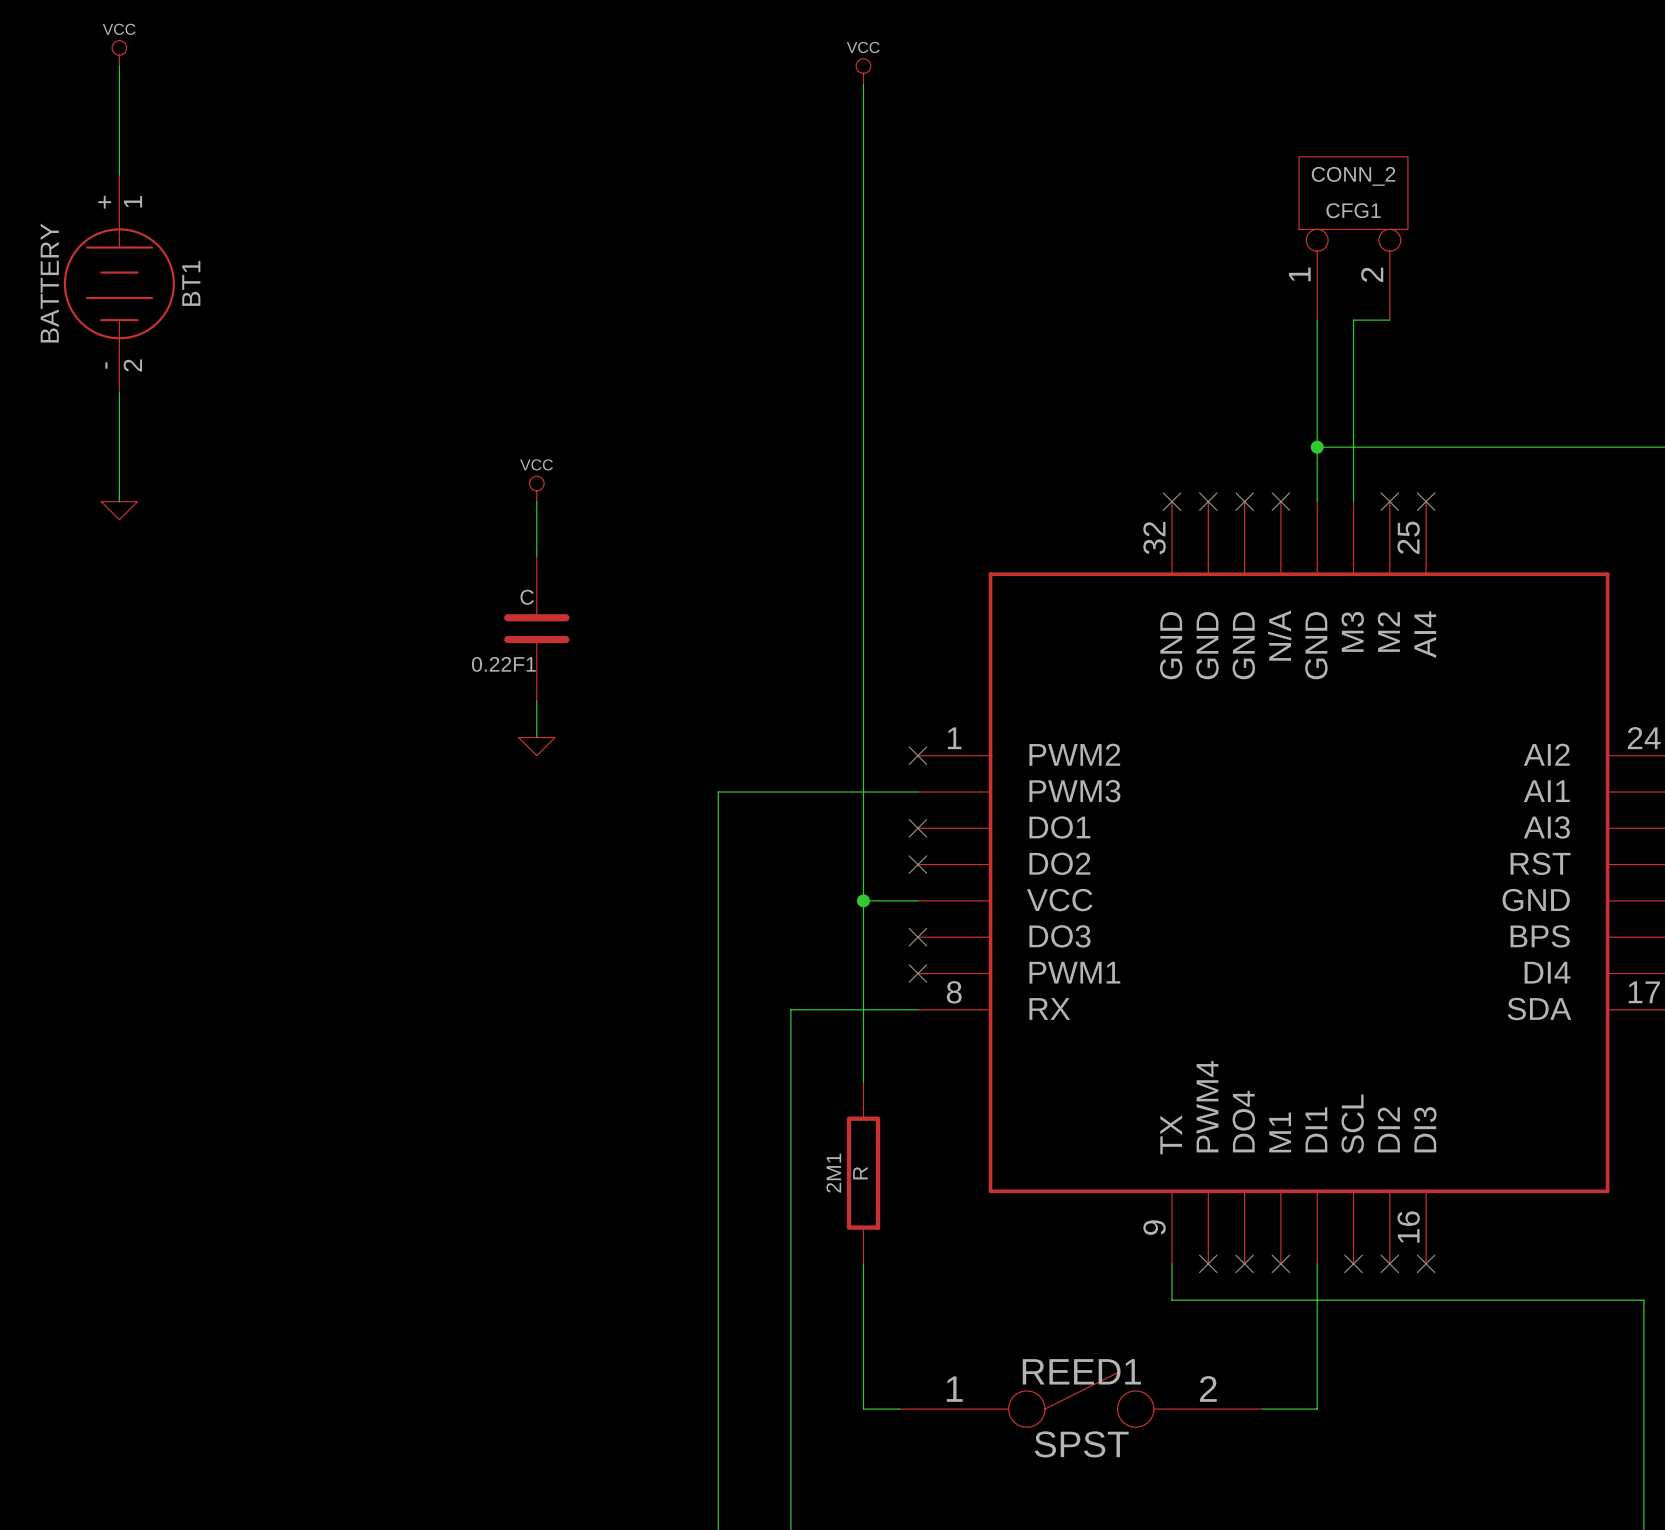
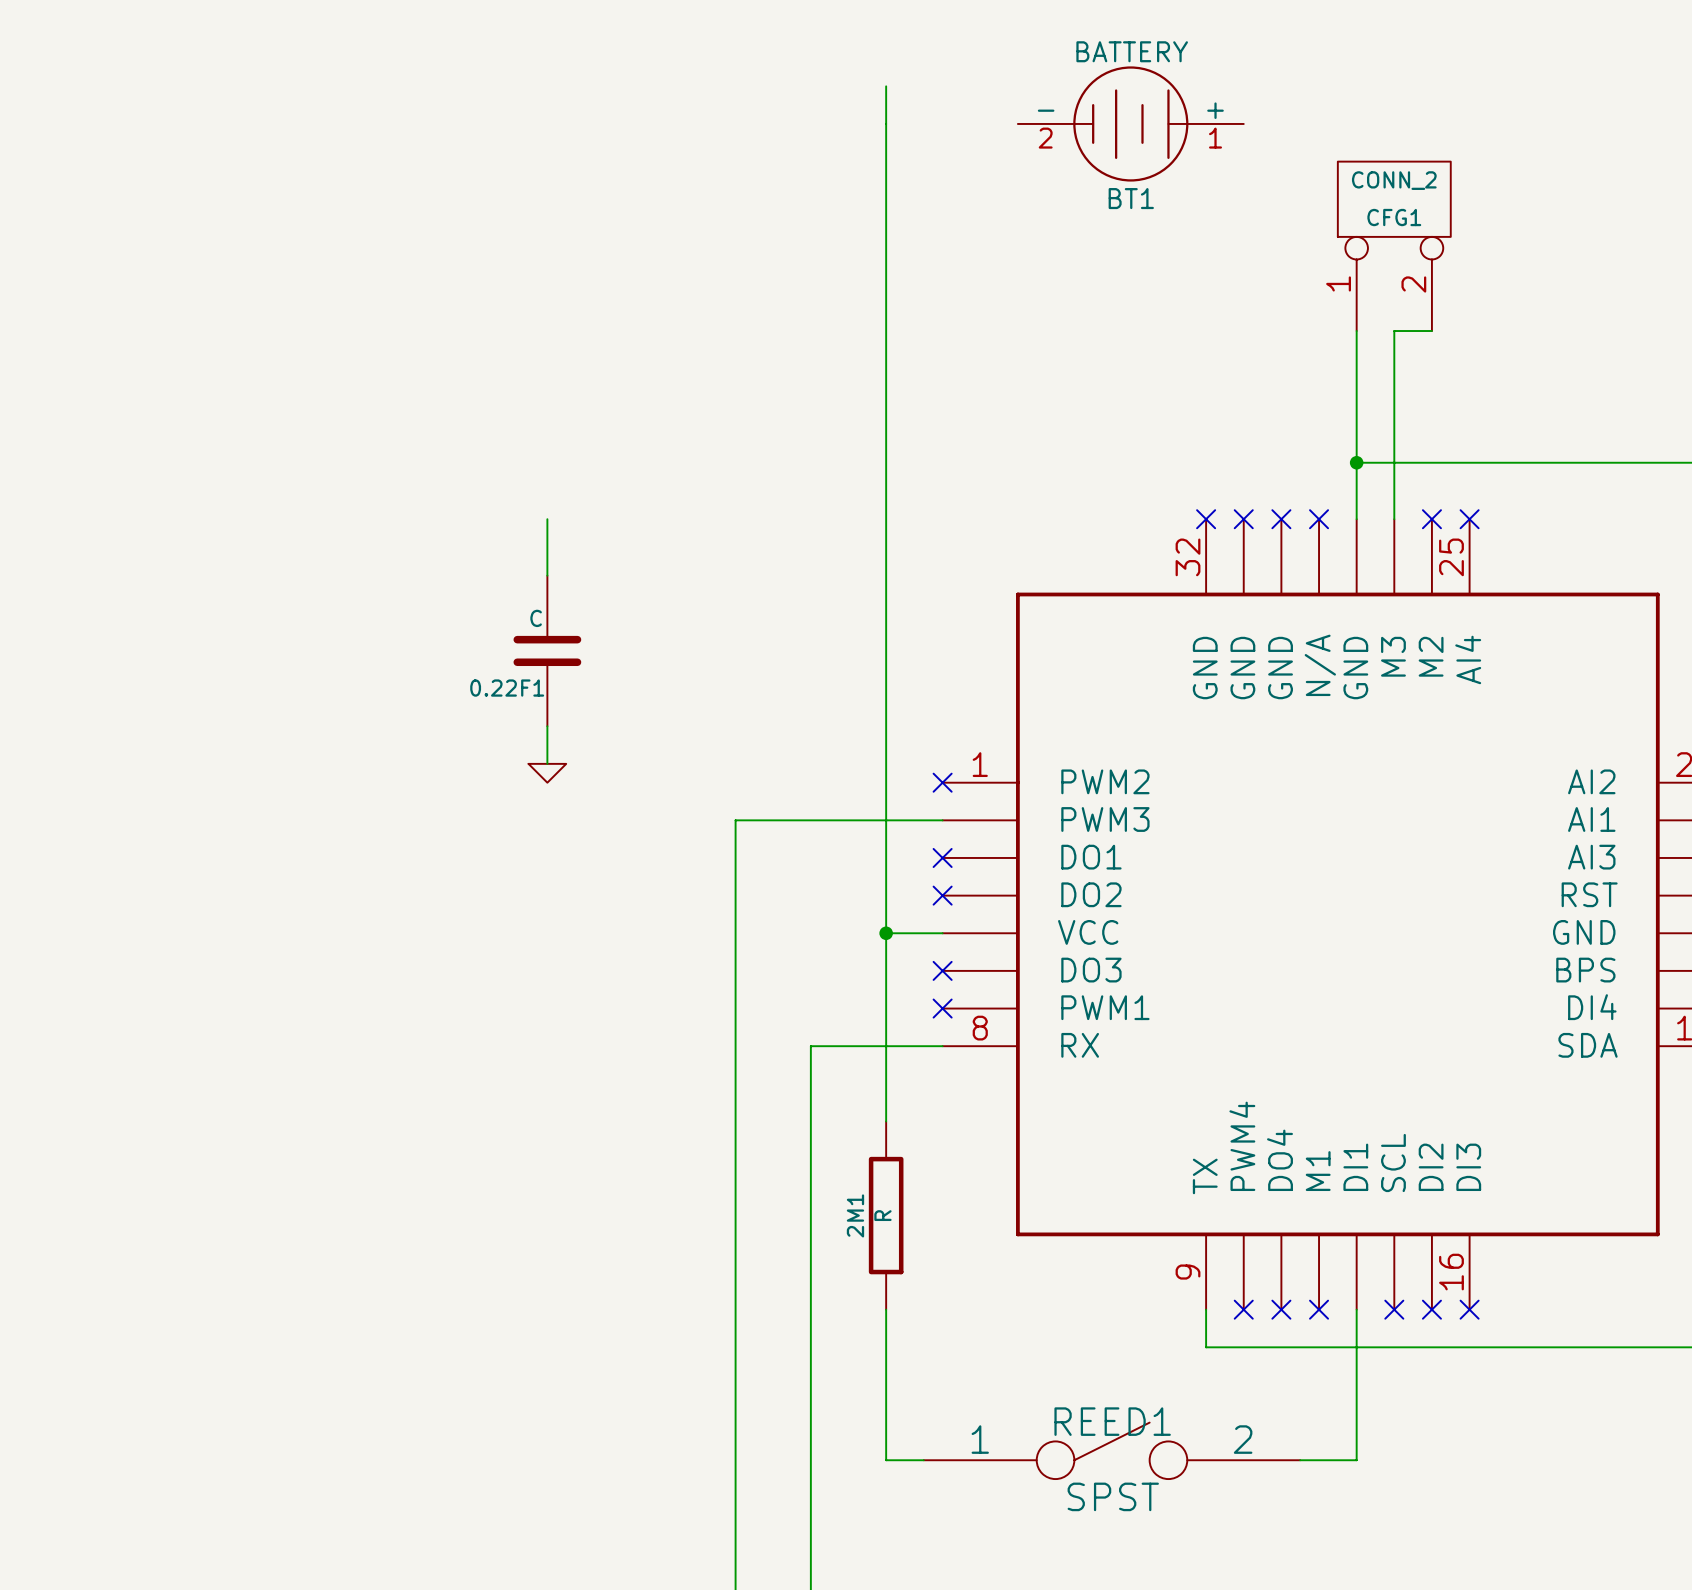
power symbol: VCC (119, 53) -> none
wire: (119, 66) (119, 174) -> none
power symbol: VCC (863, 71) -> none
BT1 rotation: 0° (119, 283) -> 90° clockwise (1130, 123)
BT1 position: (119, 283) -> (1130, 123)
wire: (119, 392) (119, 501) -> none
power symbol: VCC (536, 488) -> none
power symbol: (119, 510) -> none

